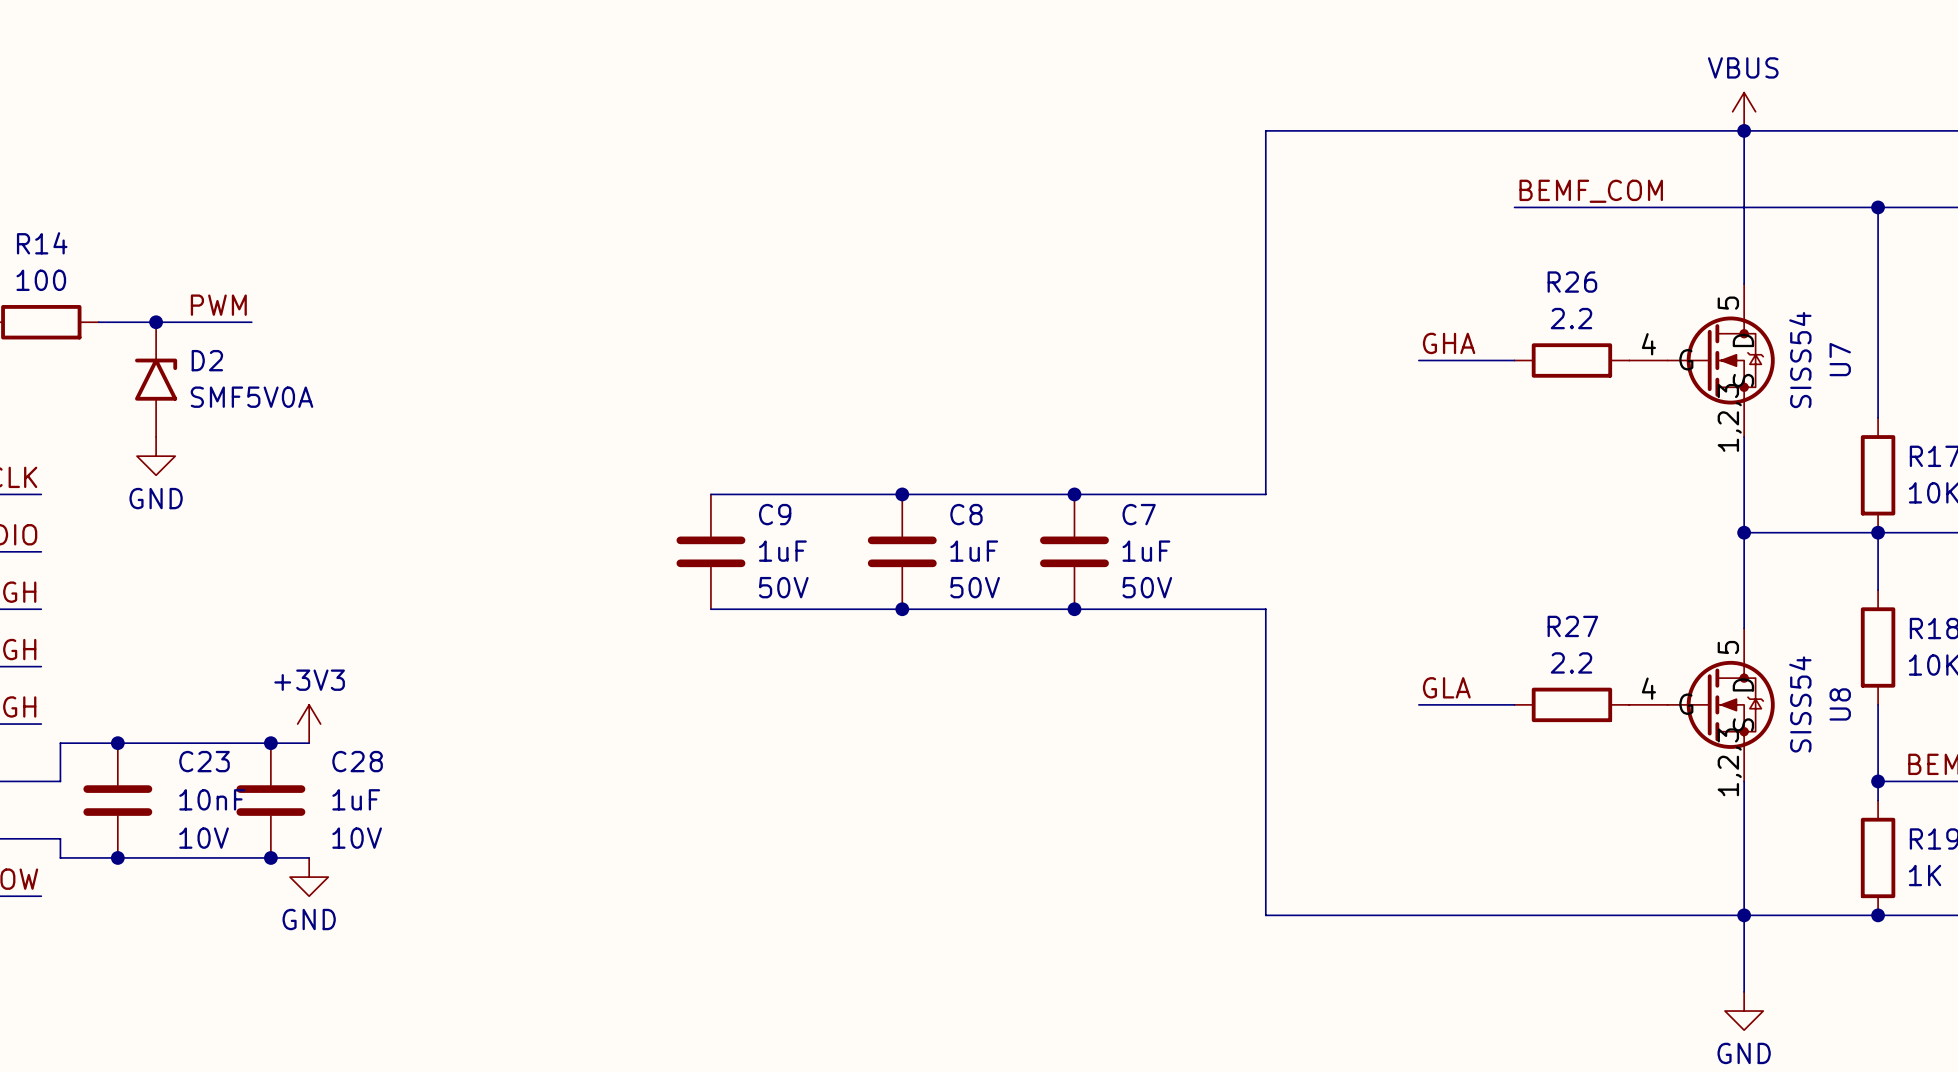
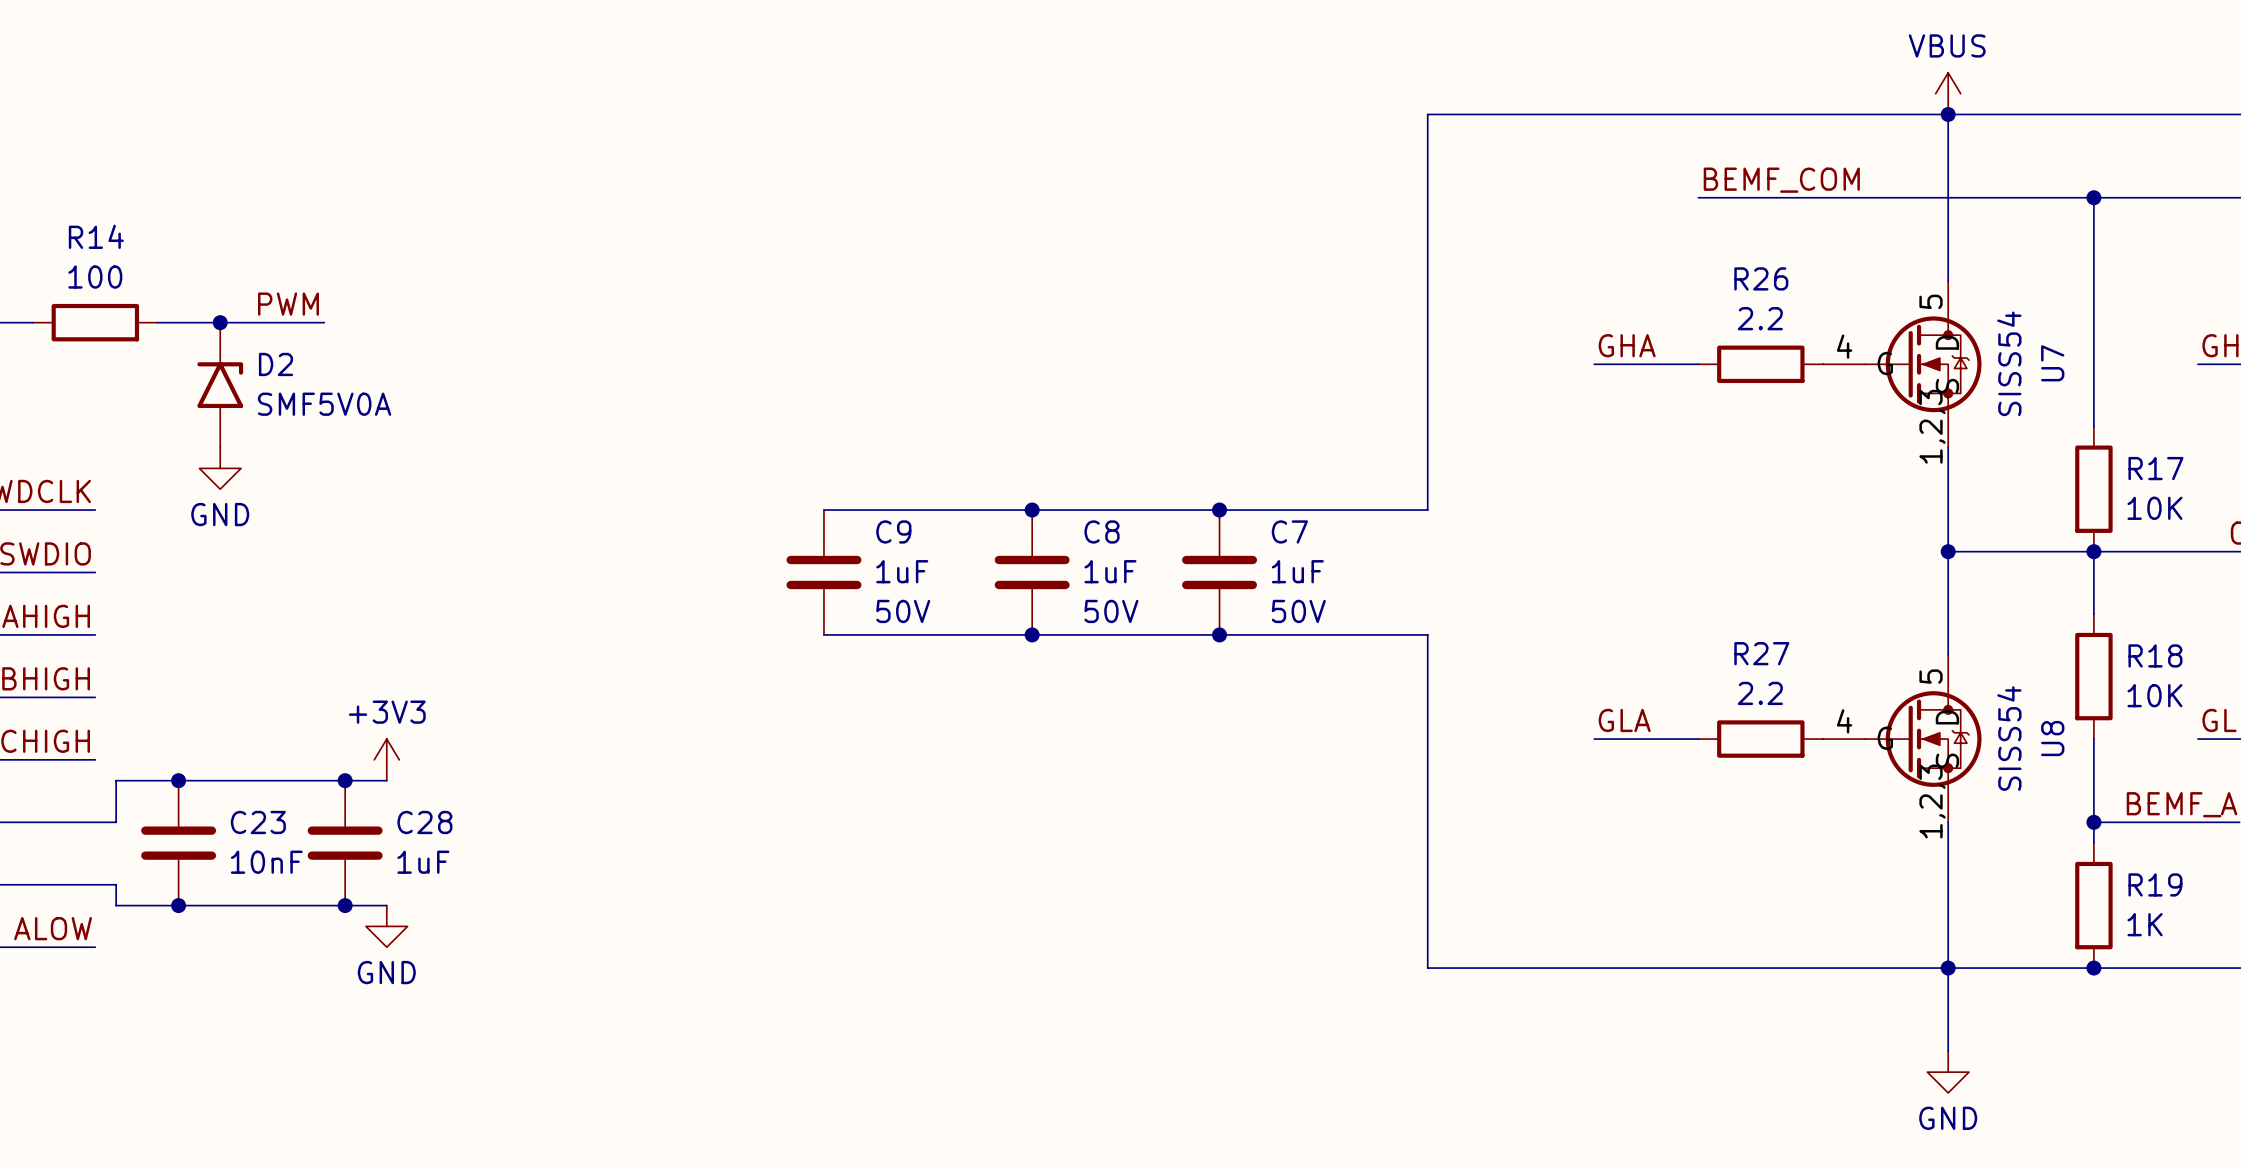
C23 name position: C23 (204, 761) -> C23 (258, 822)
C28 name position: C28 (357, 761) -> C28 (424, 822)
C23 value position: 10nF (212, 799) -> 10nF (266, 862)
C28 value position: 1uF (356, 799) -> 1uF (423, 862)
C23 text: 10V (204, 838) -> none
C28 text: 10V (357, 838) -> none

